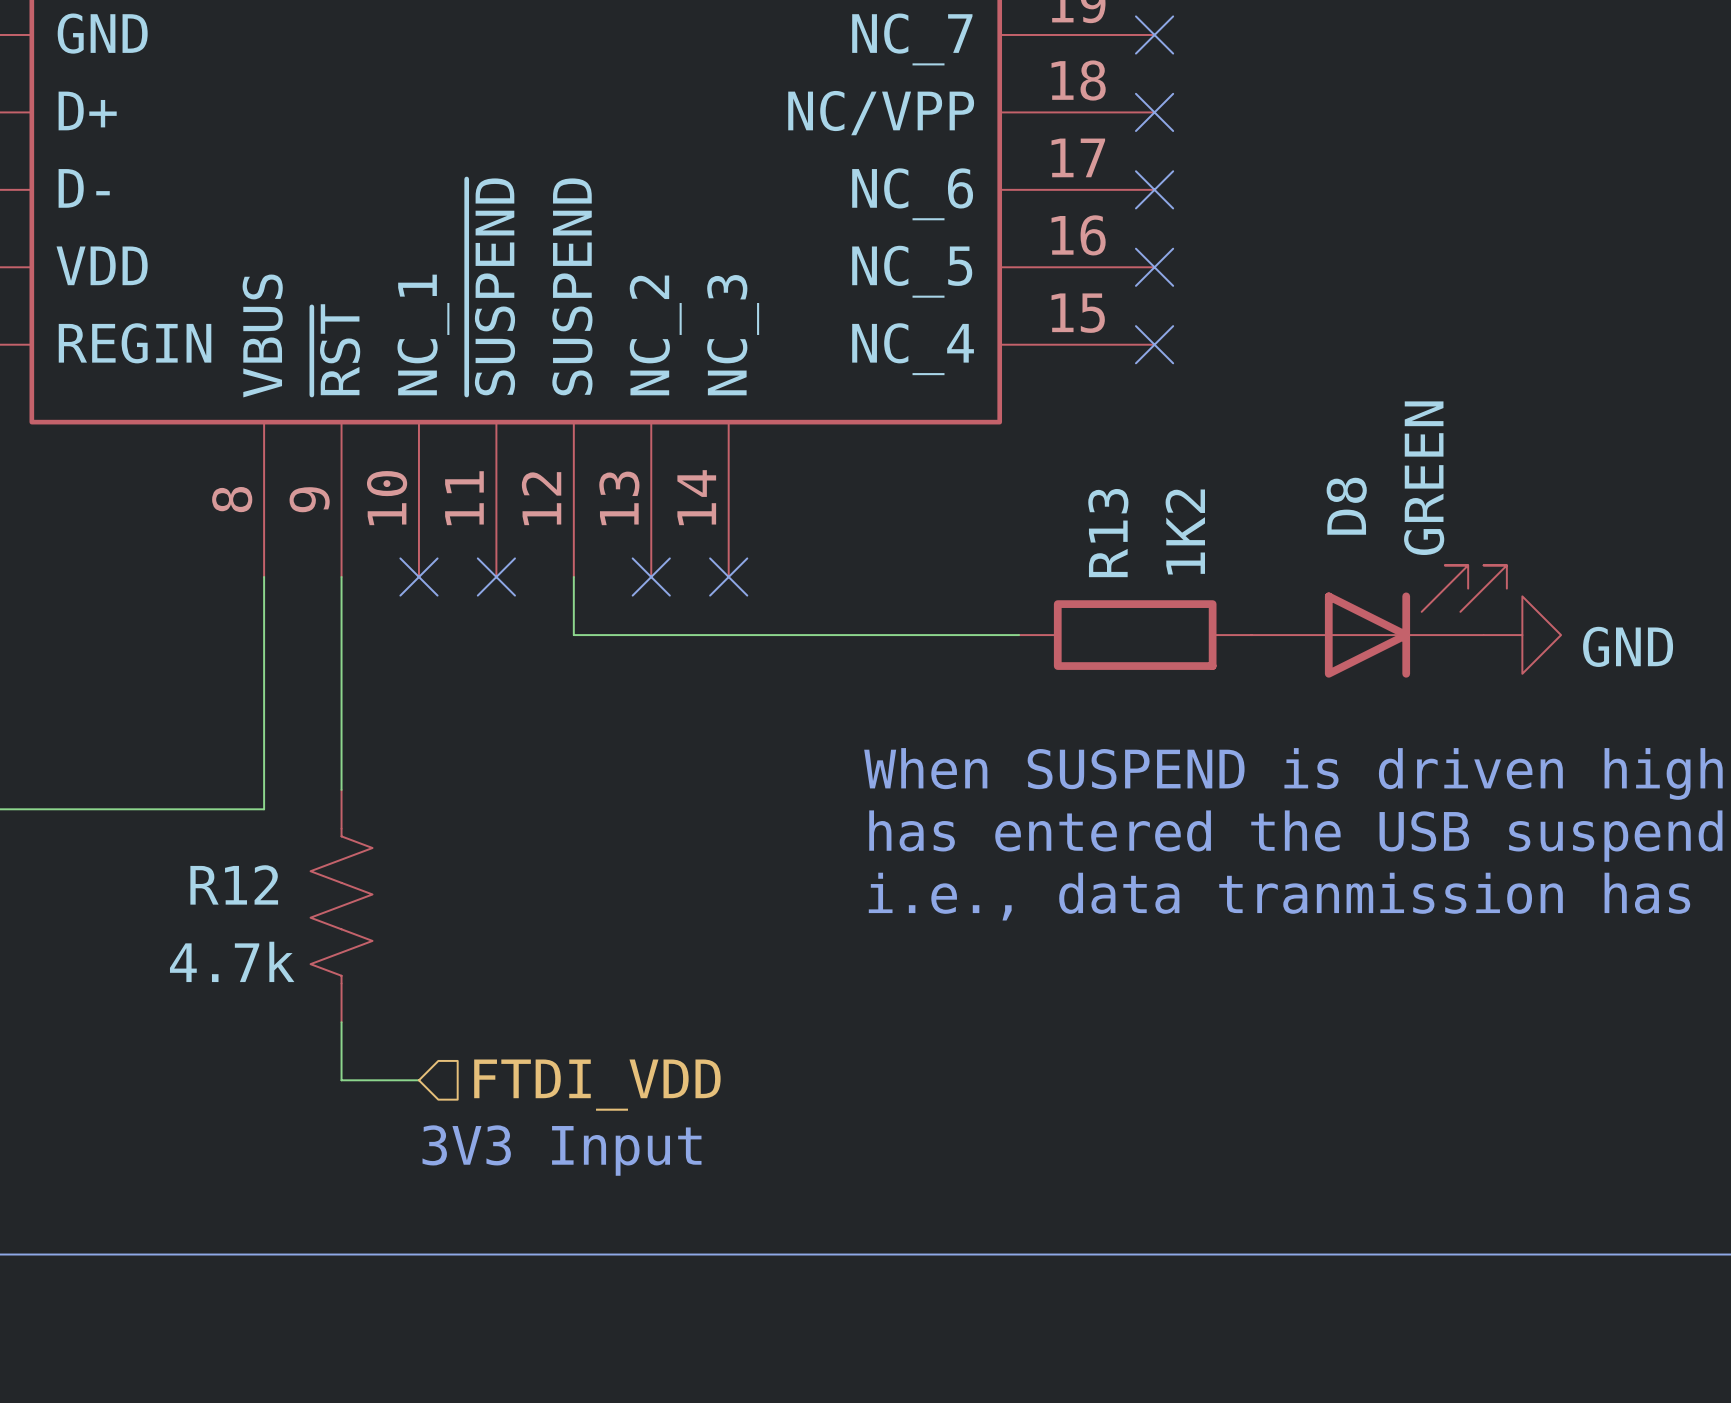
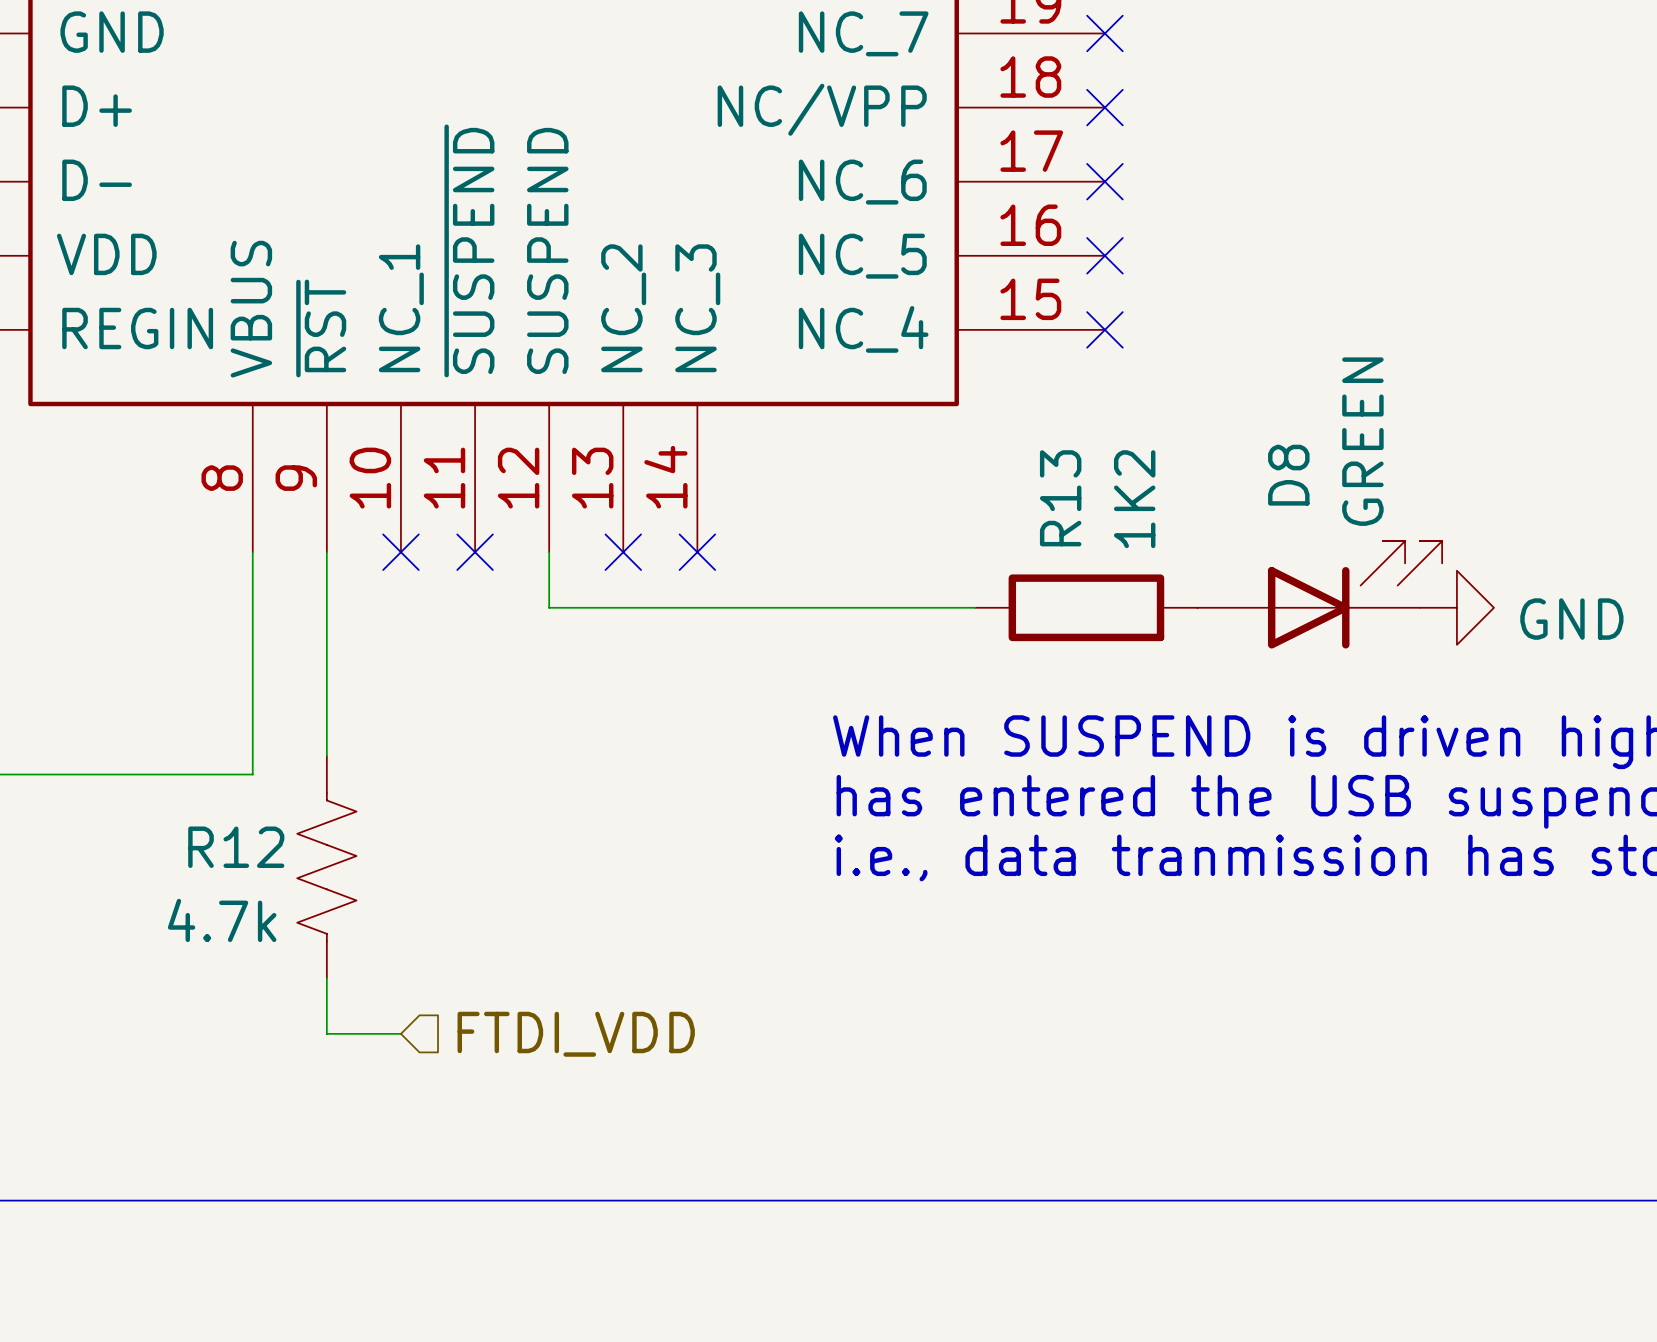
text: 3V3 Input (562, 1150) -> none

